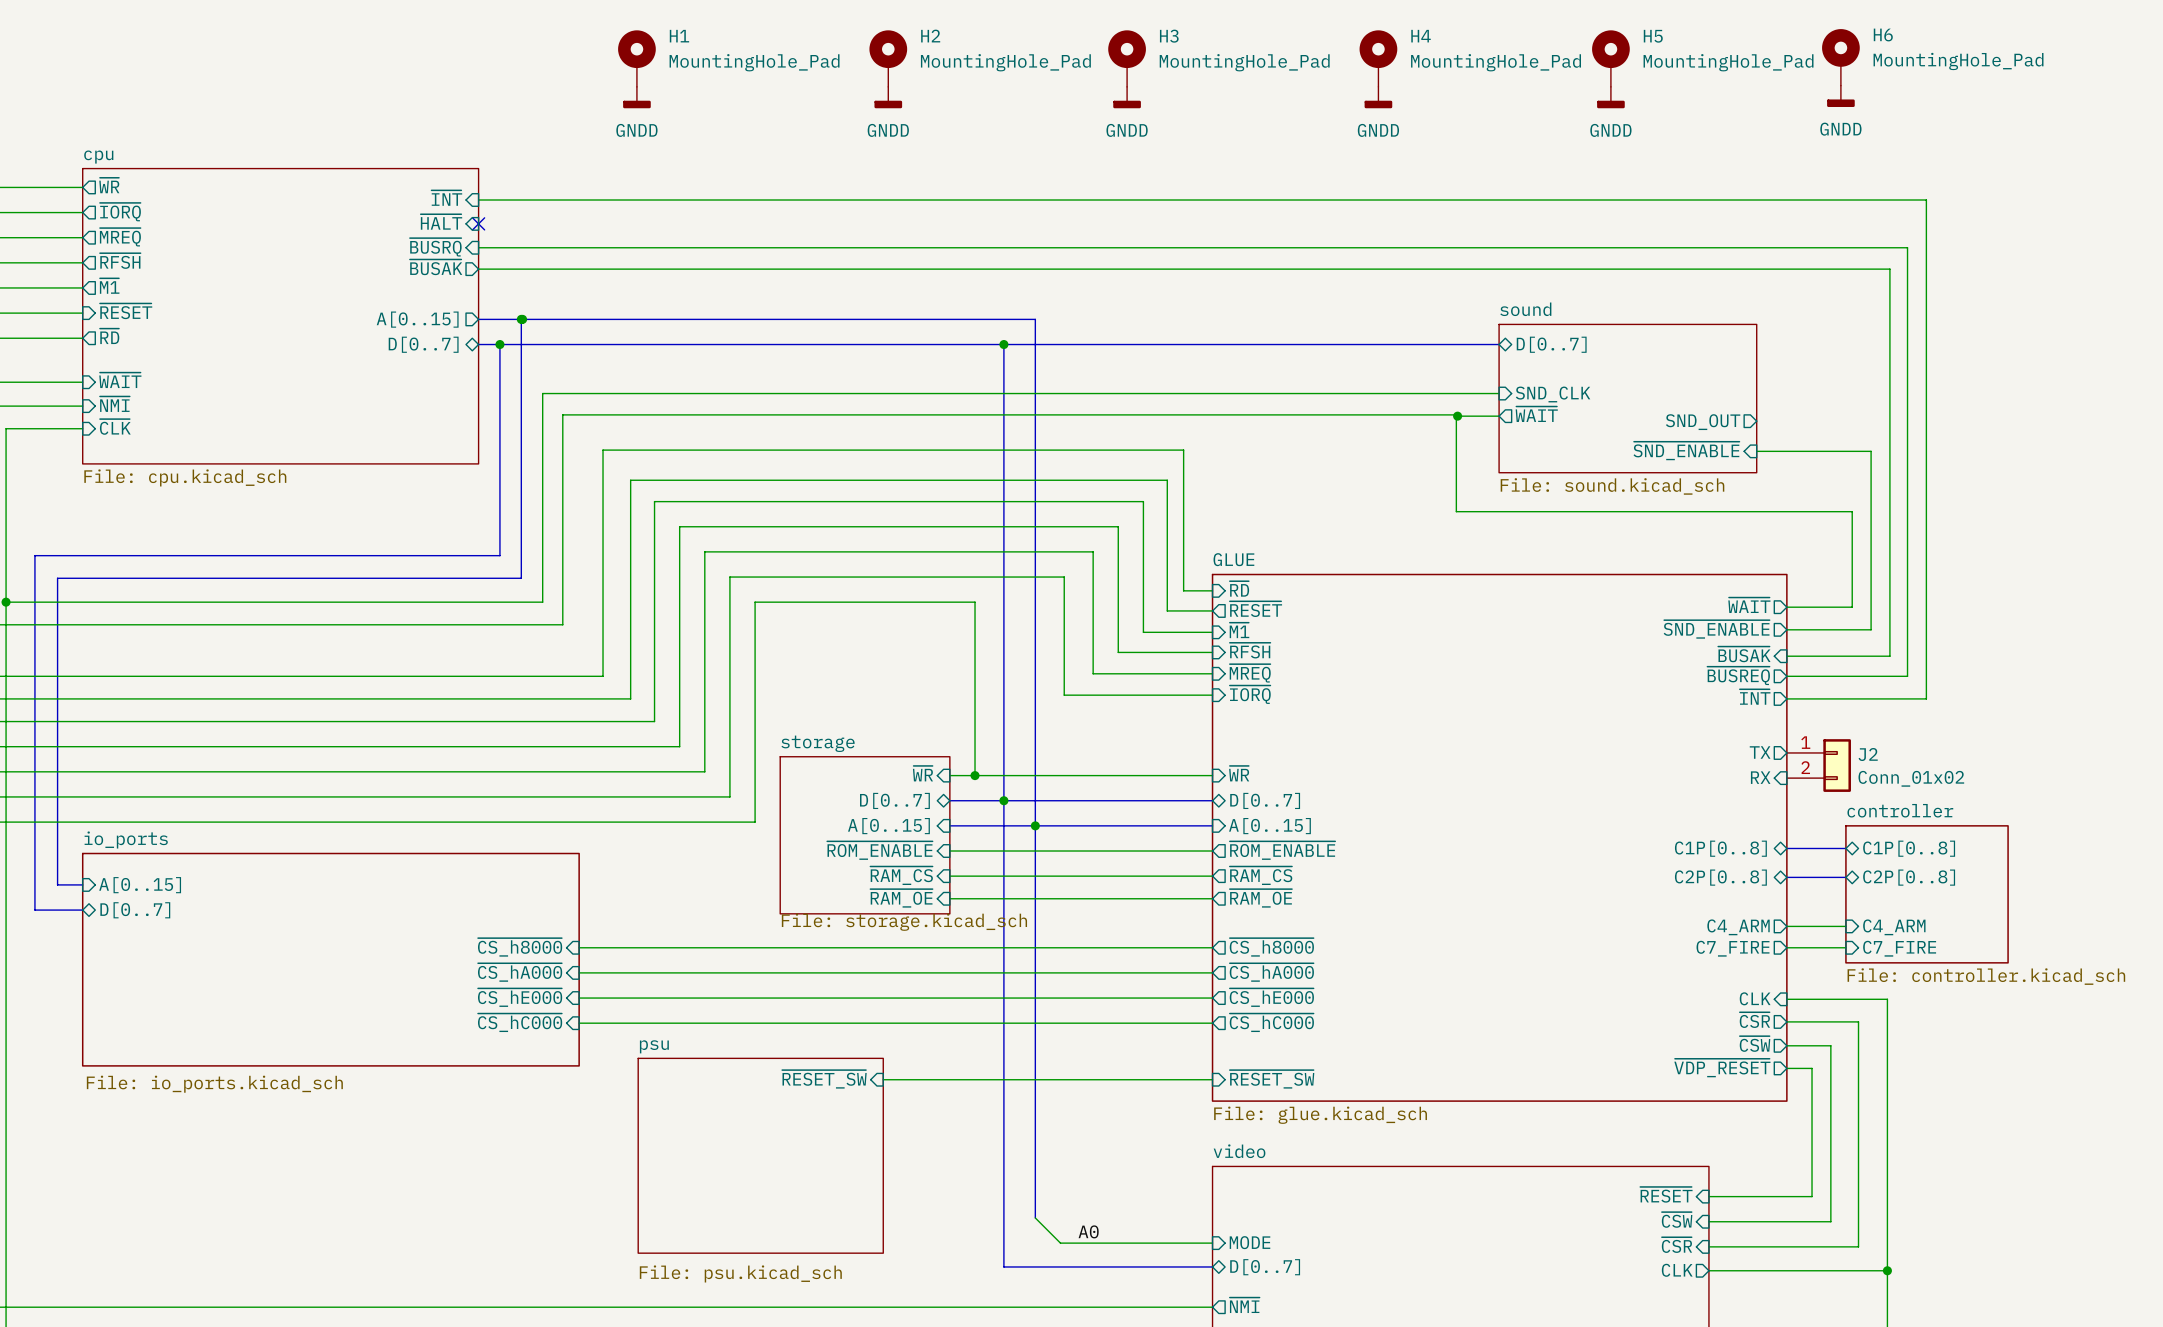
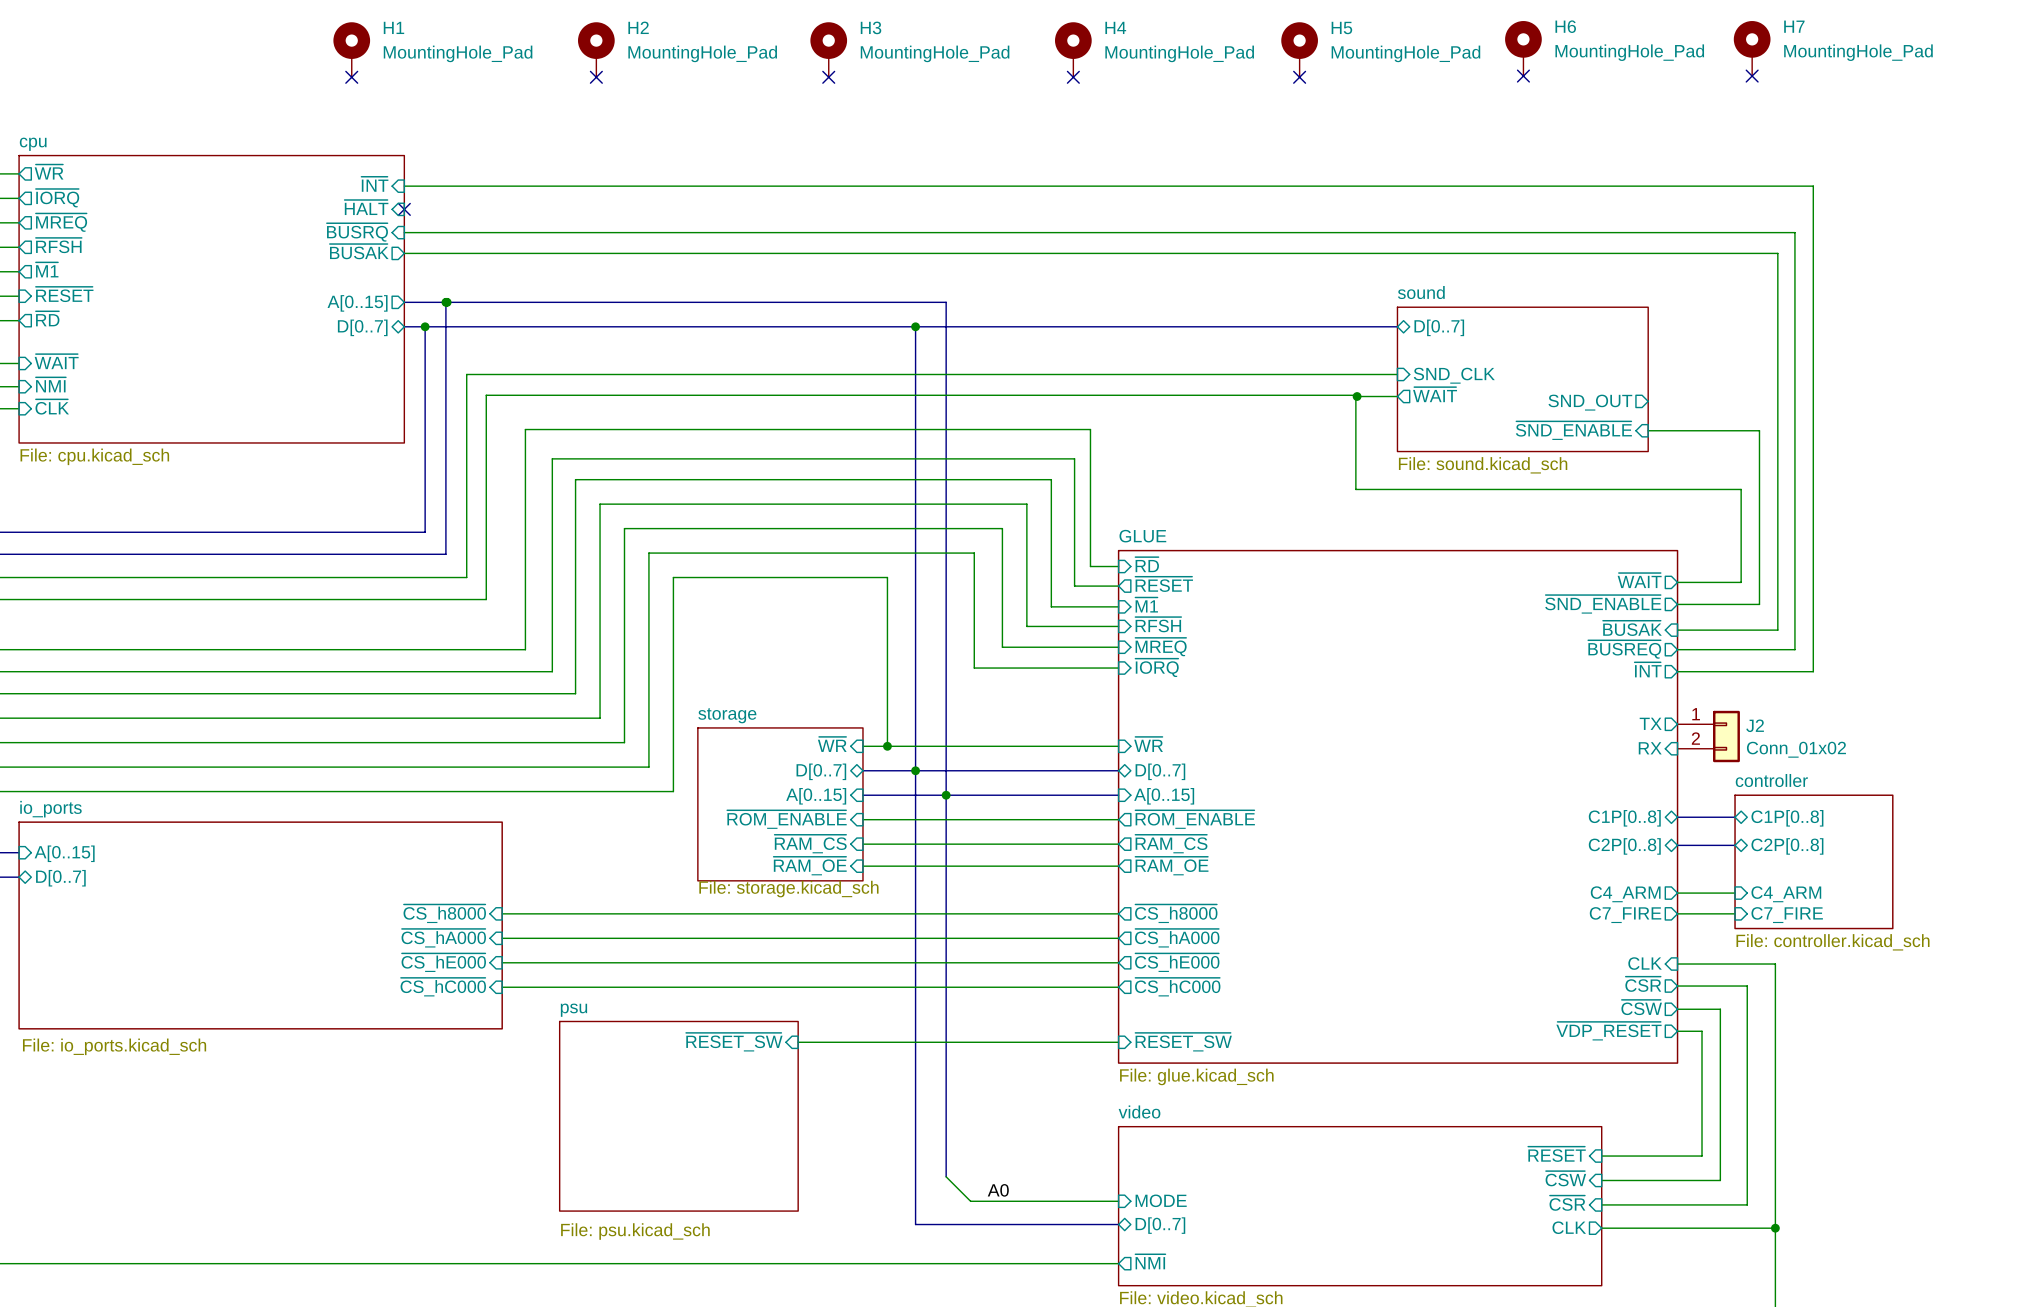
H6 position: (1840, 57) -> (1523, 48)
H1 position: (636, 58) -> (351, 49)
H2 position: (888, 58) -> (596, 49)
H3 position: (1127, 58) -> (828, 49)
H4 position: (1378, 58) -> (1073, 49)
H5 position: (1610, 58) -> (1299, 49)
H7: none -> MountingHole_Pad (1752, 48)
no-connect mark: none -> (1523, 76)
no-connect mark: none -> (1752, 76)
no-connect mark: none -> (351, 77)
no-connect mark: none -> (596, 77)
no-connect mark: none -> (828, 77)
no-connect mark: none -> (1073, 77)
no-connect mark: none -> (1299, 77)
power symbol: GNDD (1840, 96) -> none
power symbol: GNDD (636, 97) -> none
power symbol: GNDD (888, 97) -> none
power symbol: GNDD (1127, 97) -> none
power symbol: GNDD (1378, 97) -> none
power symbol: GNDD (1610, 97) -> none

